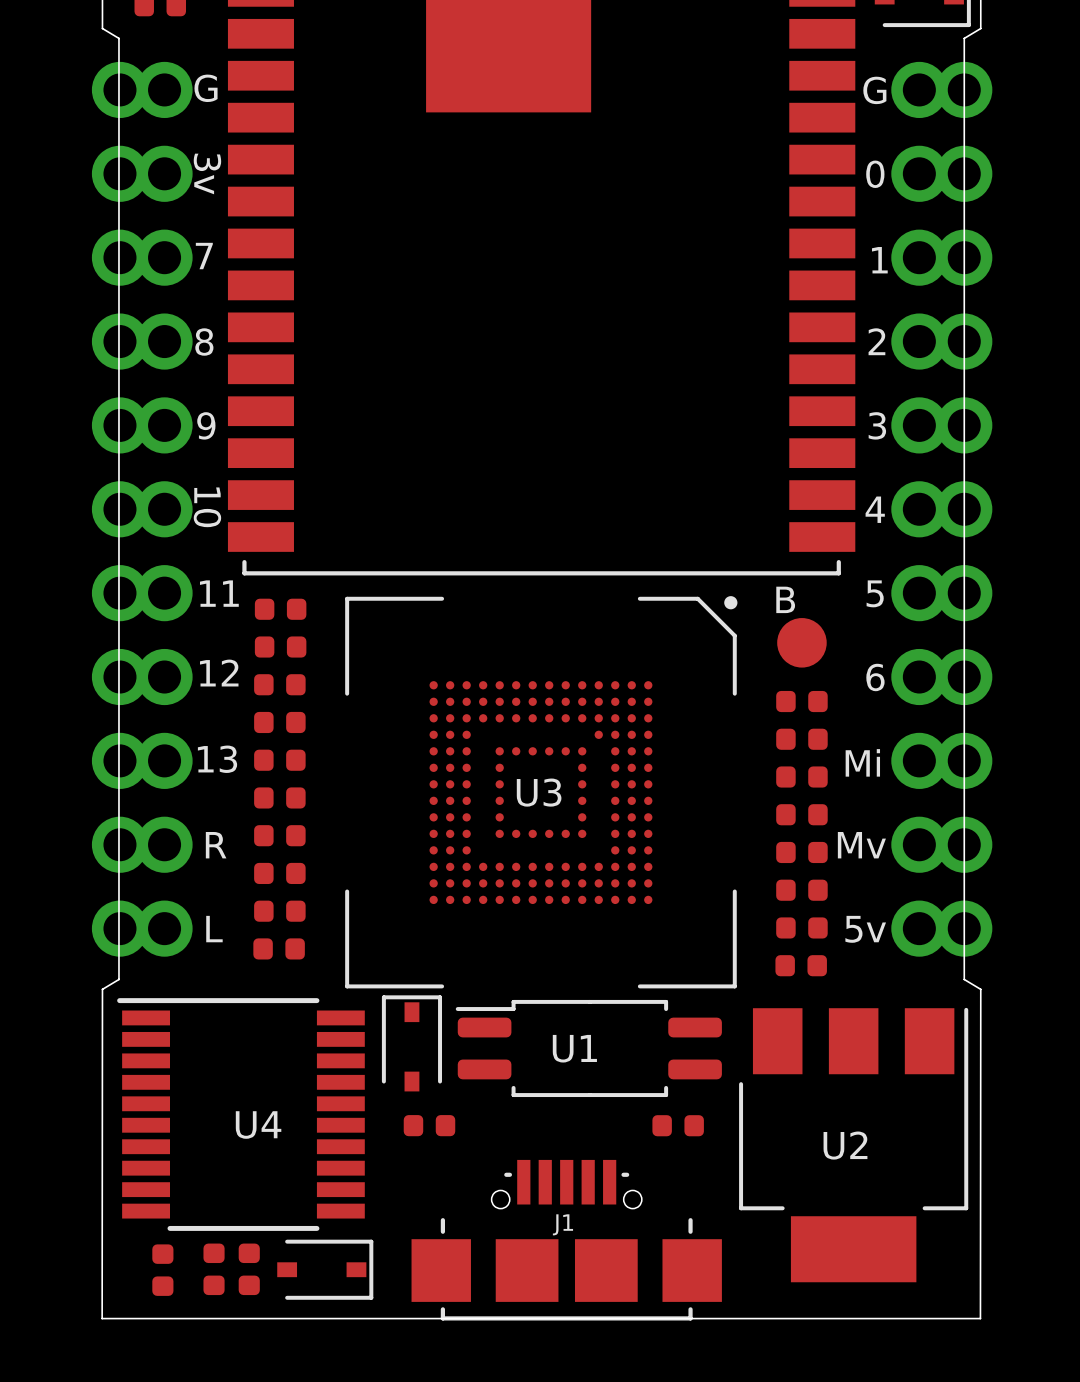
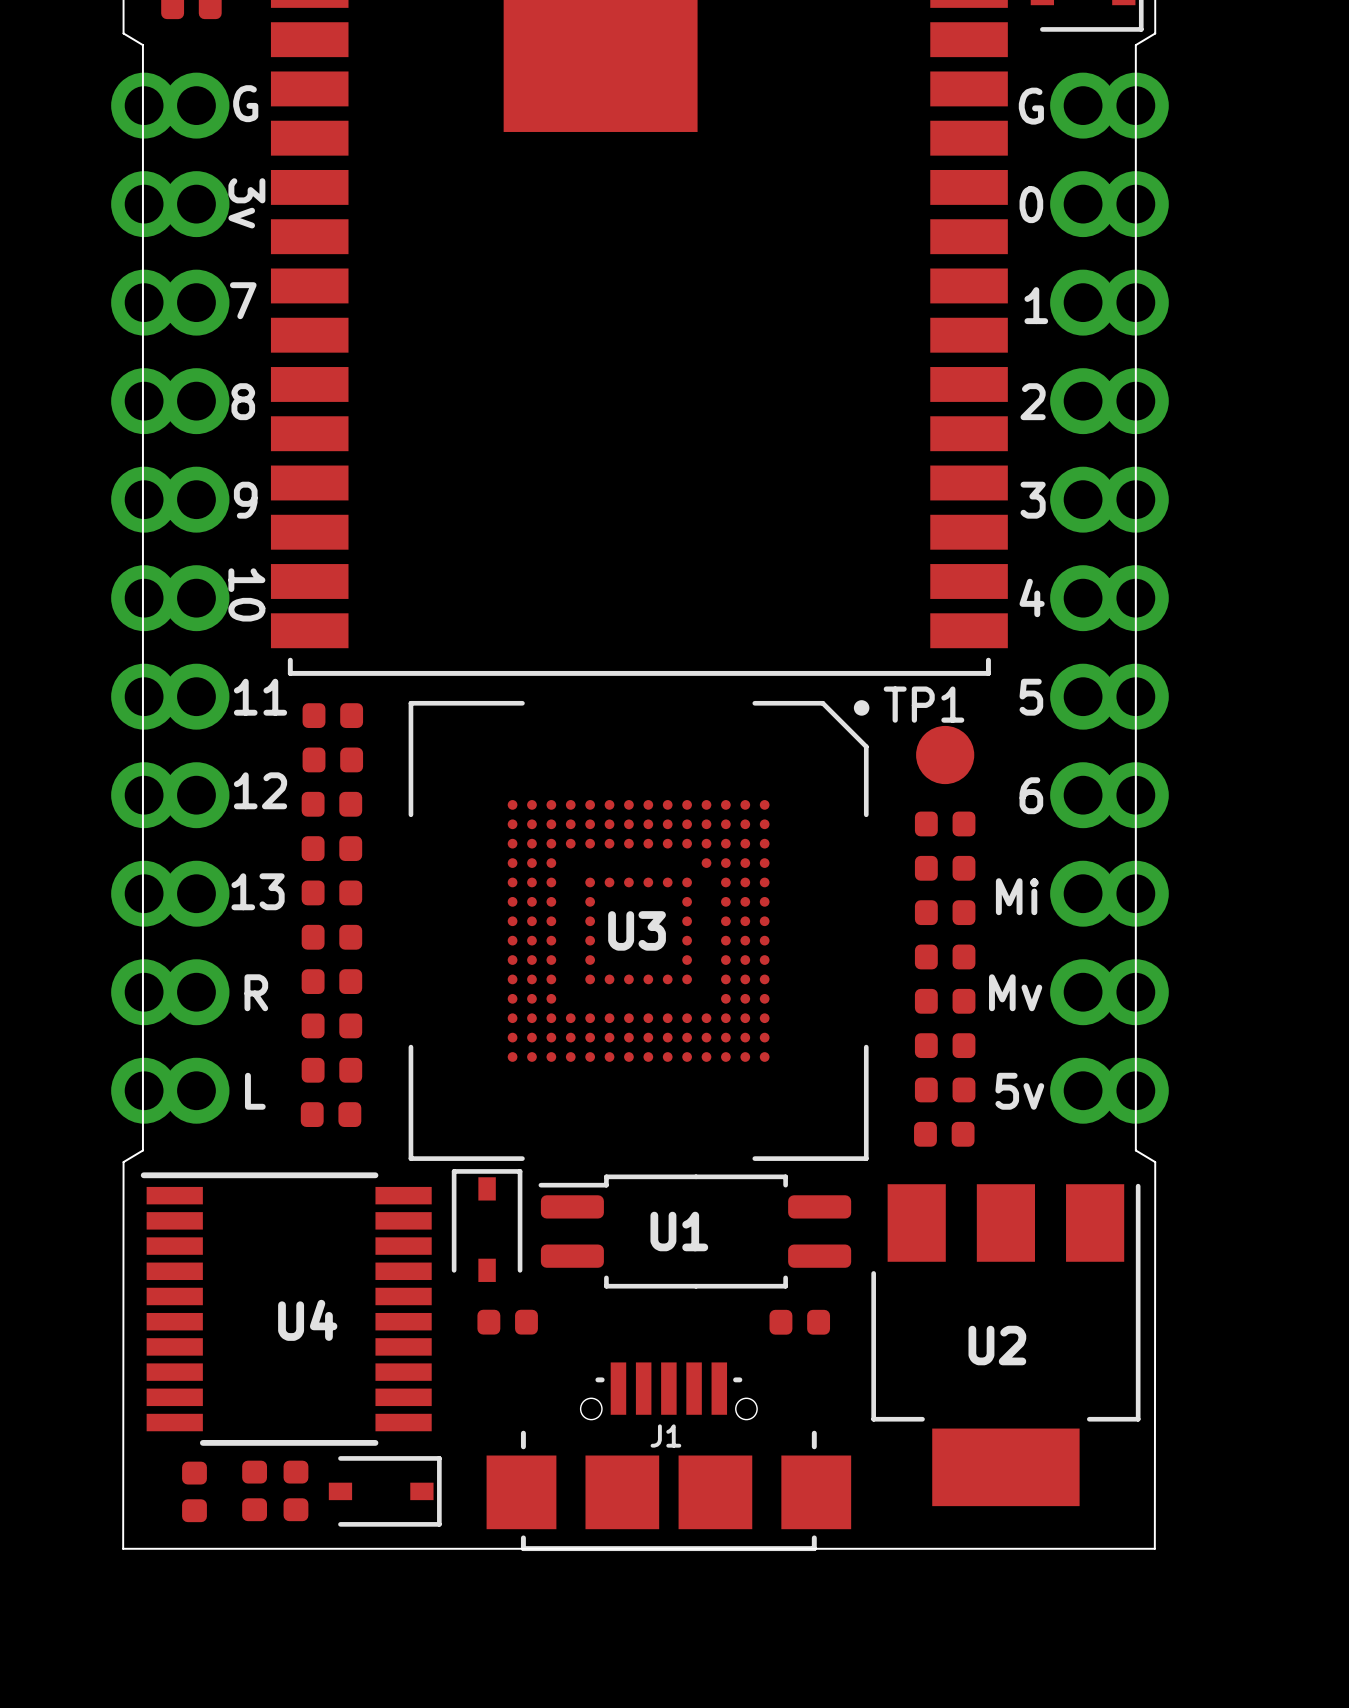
B name: B (785, 599) -> TP1 (923, 704)

